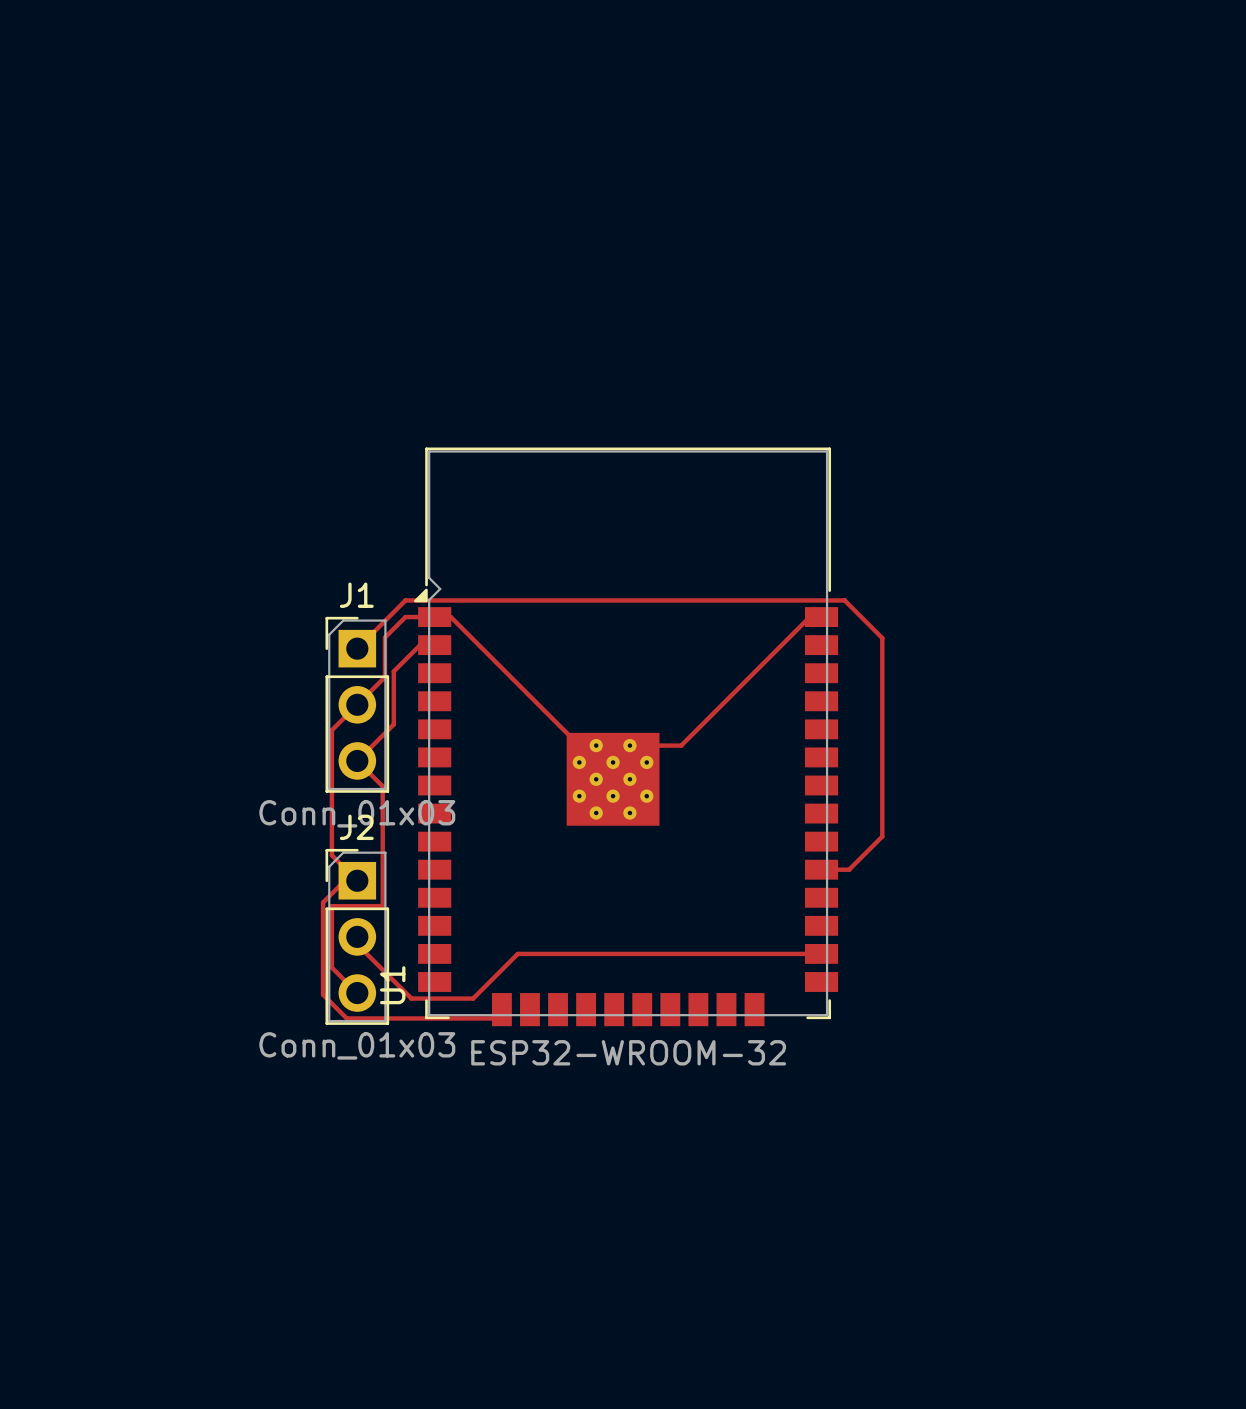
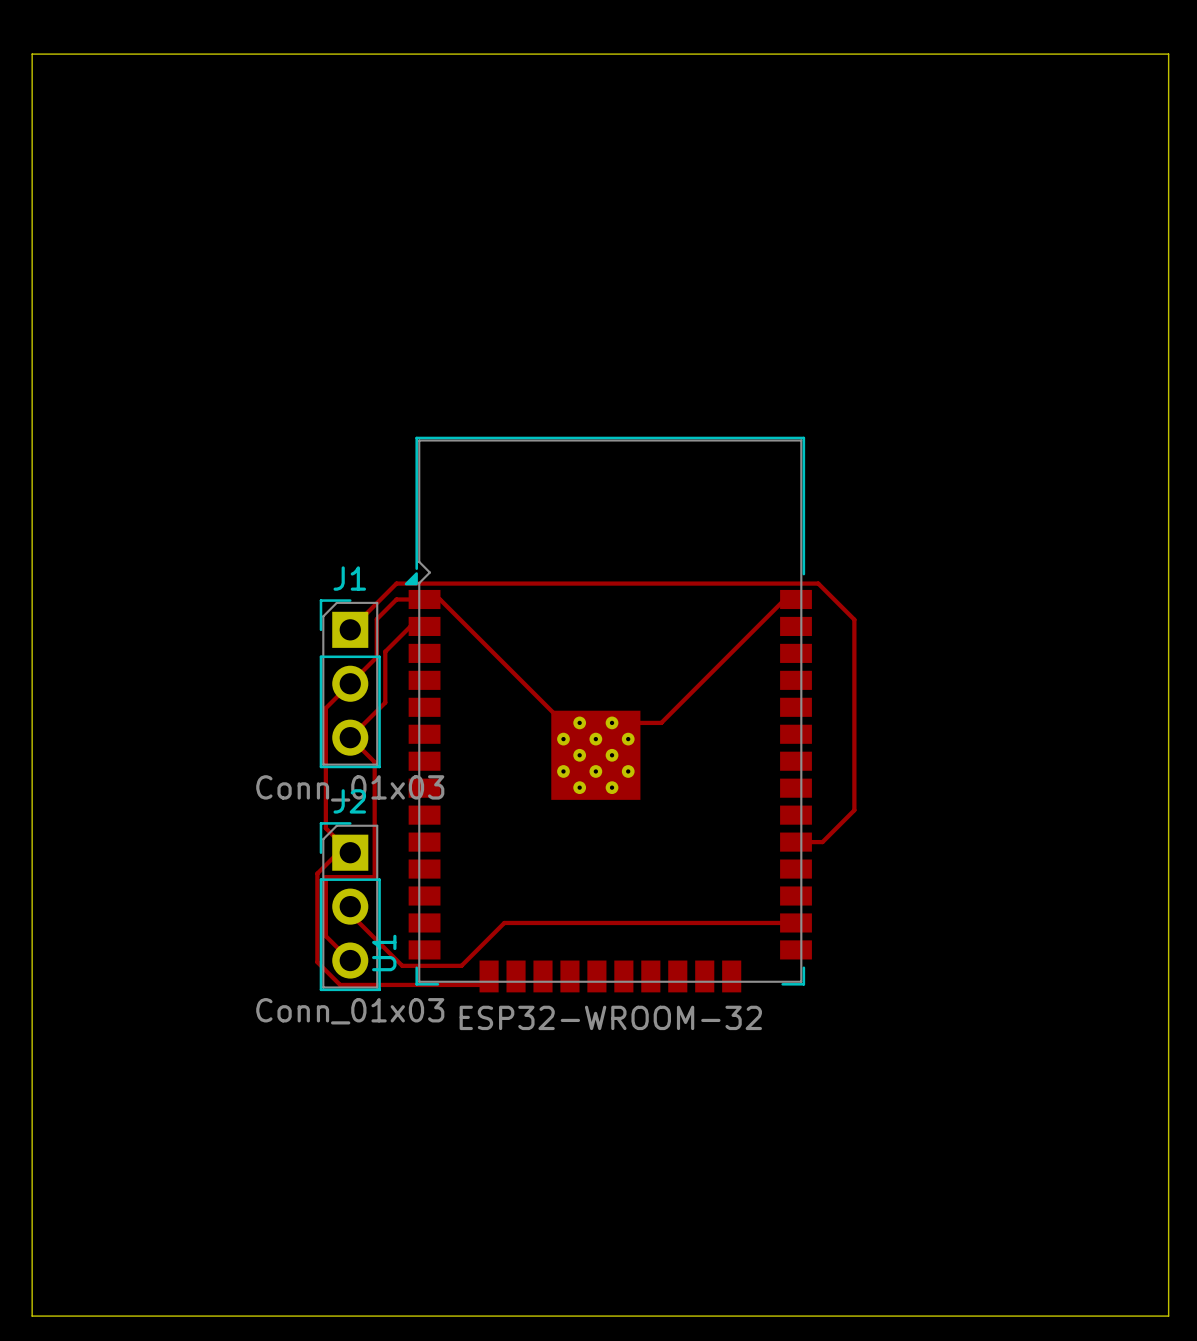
board edge: none -> (32, 54) (1168, 54) (1168, 1316) (32, 1316) (32, 54)

